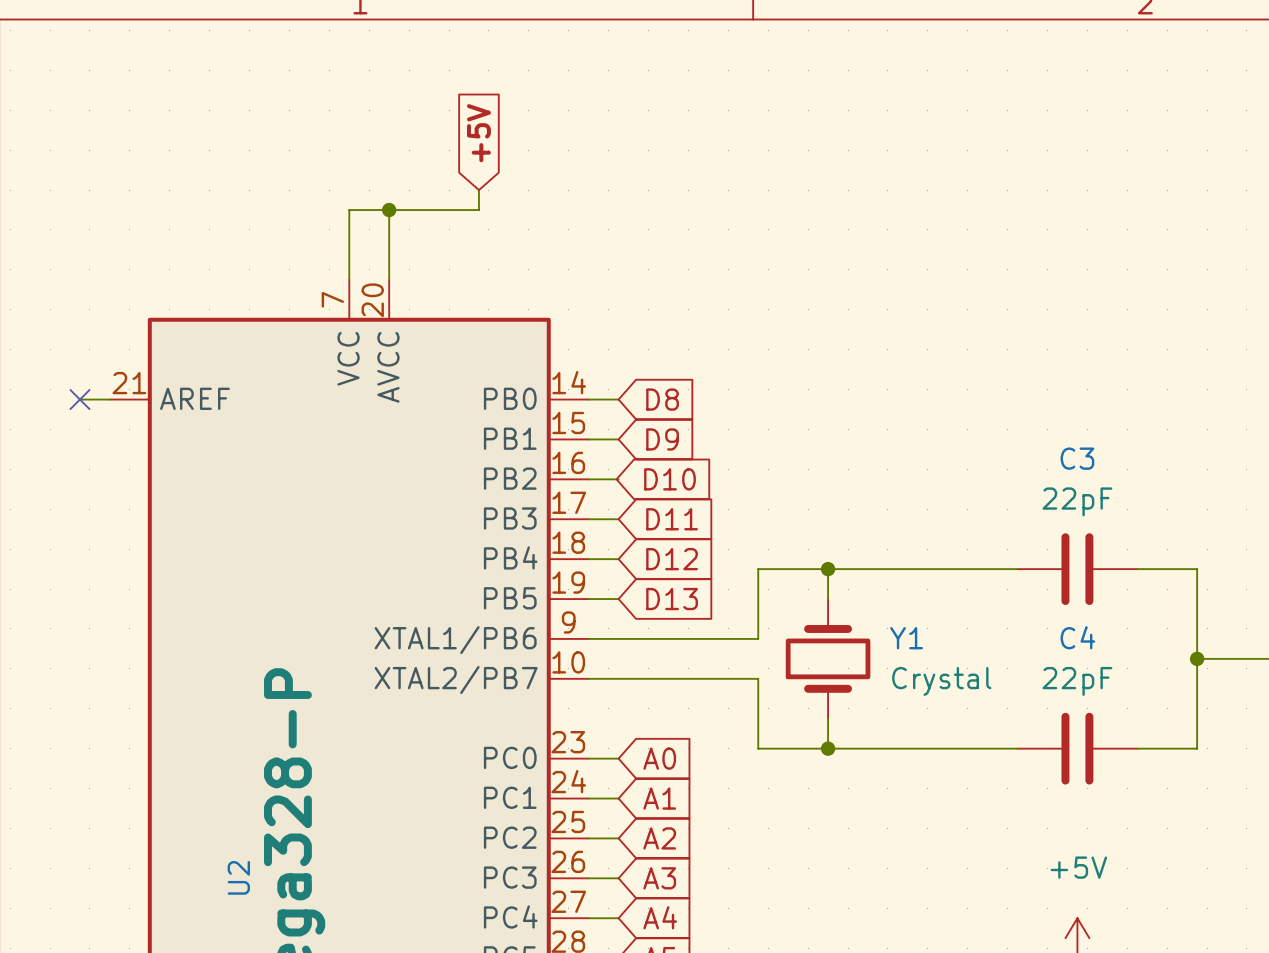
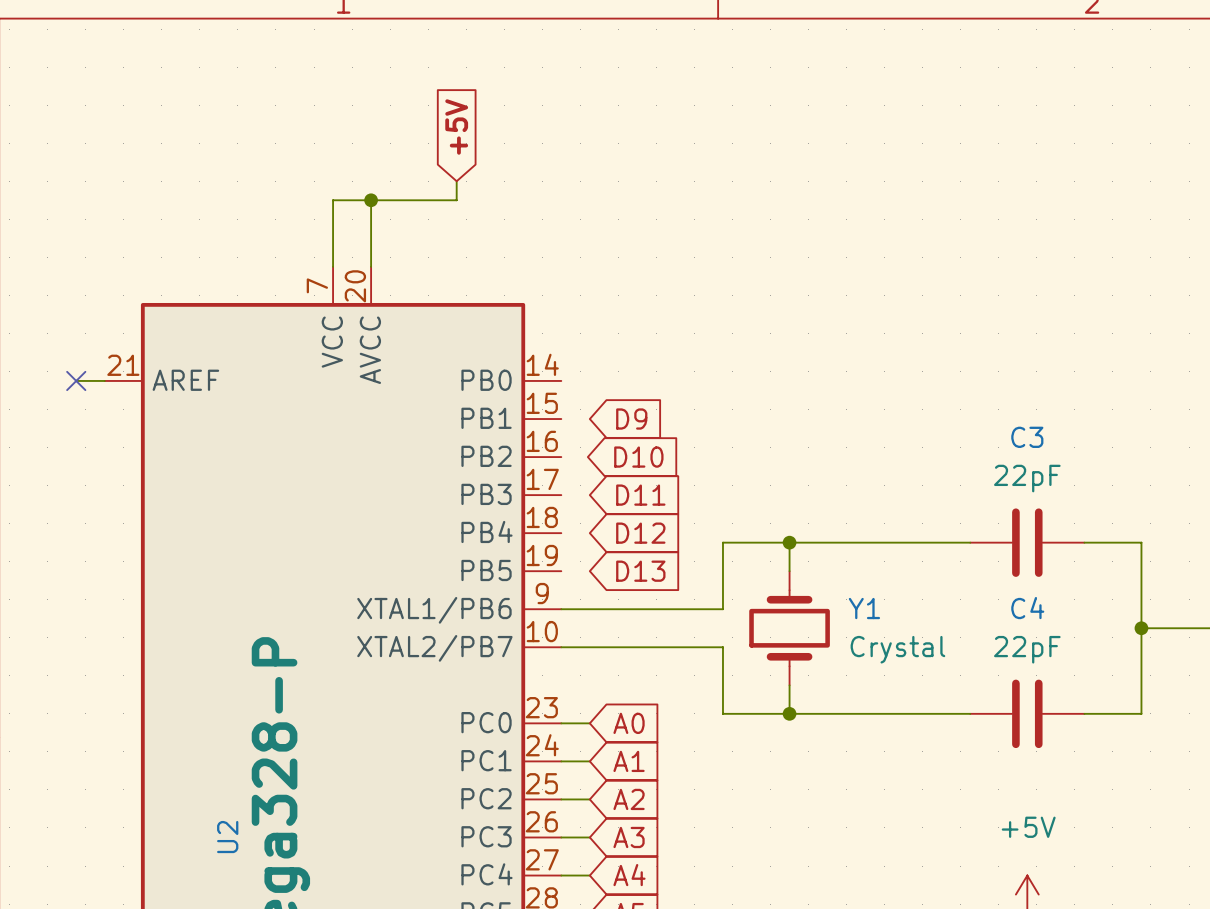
wire: (588, 399) (618, 399) -> none
global label: D8 (662, 399) -> none
wire: (588, 439) (618, 439) -> none
wire: (588, 479) (618, 479) -> none
wire: (588, 519) (618, 519) -> none
wire: (588, 559) (618, 559) -> none
wire: (588, 599) (618, 599) -> none

